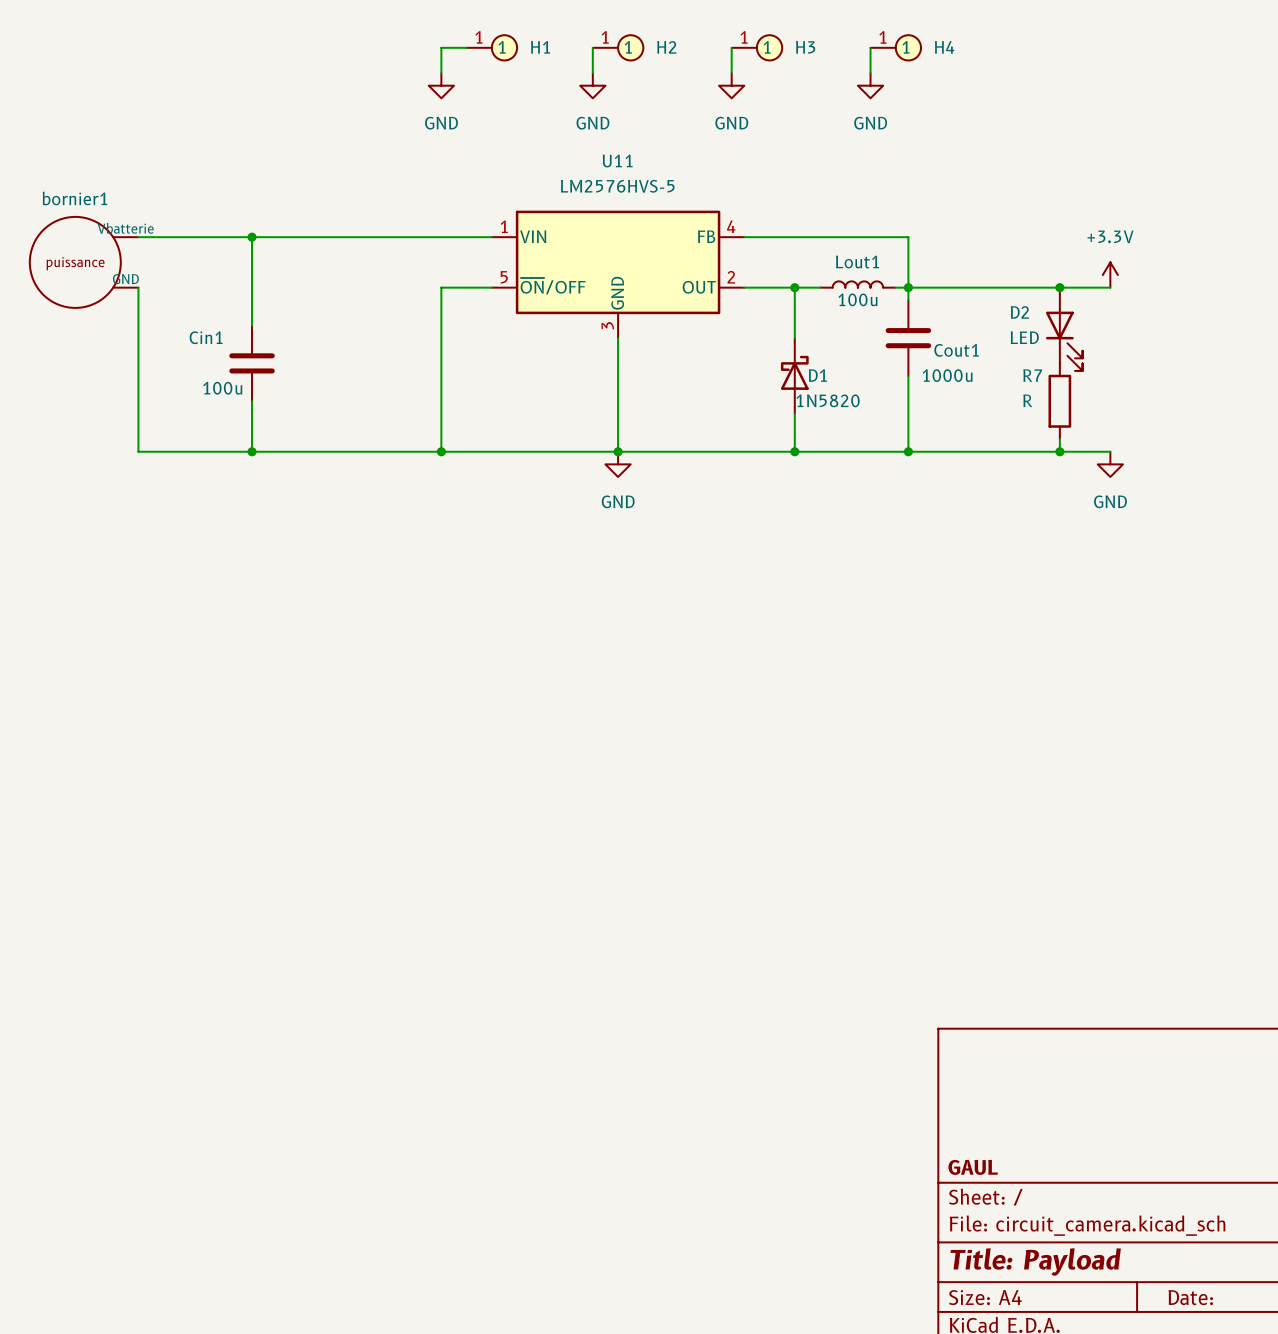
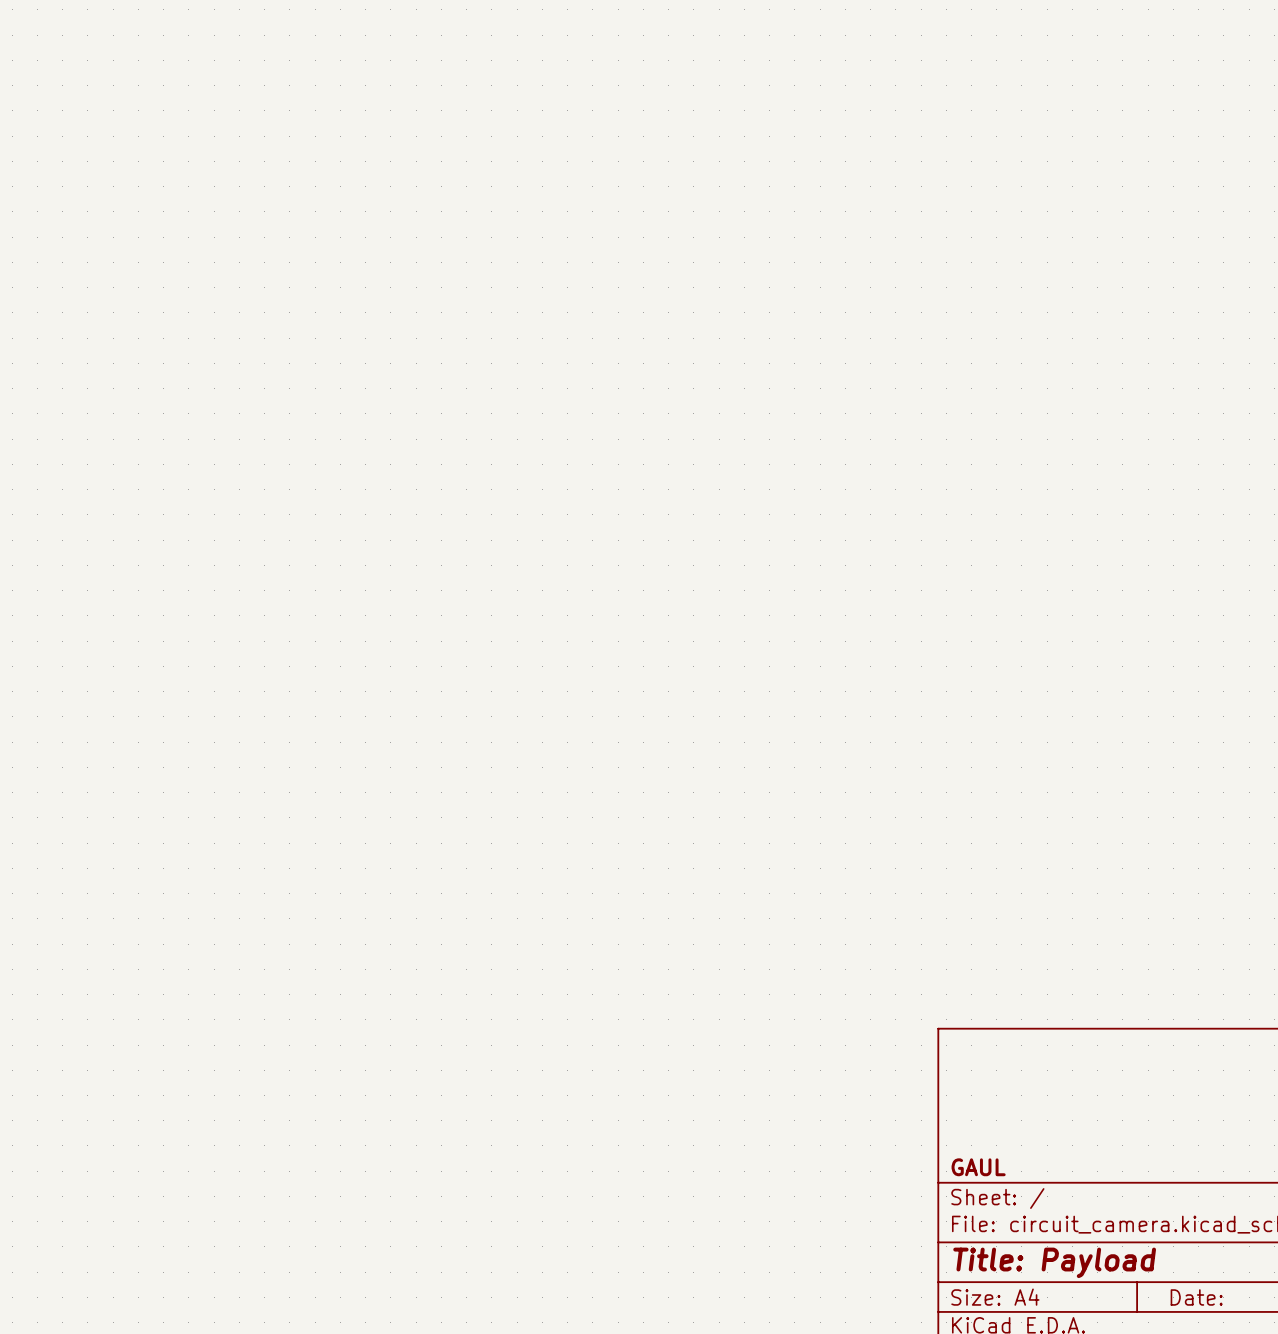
wire: (466, 47) (441, 47) (441, 73) -> none
H1: (491, 47) -> none
wire: (592, 47) (592, 73) -> none
H2: (618, 47) -> none
wire: (731, 47) (731, 73) -> none
H3: (756, 47) -> none
wire: (870, 47) (870, 73) -> none
H4: (895, 47) -> none
power symbol: GND (441, 85) -> none
power symbol: GND (592, 85) -> none
power symbol: GND (731, 85) -> none
power symbol: GND (870, 85) -> none
wire: (138, 237) (491, 237) -> none
wire: (252, 237) (252, 325) -> none
junction: (252, 237) -> none
wire: (744, 237) (908, 237) (908, 300) -> none
bornier1: (84, 262) -> none
U11: LM2576HVS-5 (618, 274) -> none
power symbol: +3.3V (1110, 275) -> none
Lout1: 100u (857, 284) -> none
wire: (138, 287) (138, 451) (1110, 451) -> none
wire: (491, 287) (441, 287) (441, 451) -> none
wire: (744, 287) (820, 287) -> none
wire: (794, 287) (794, 338) -> none
junction: (794, 287) -> none
wire: (895, 287) (1110, 287) -> none
junction: (908, 287) -> none
junction: (1059, 287) -> none
D2: LED (1064, 329) -> none
wire: (618, 338) (618, 451) -> none
Cout1: 1000u (908, 338) -> none
Cin1: 100u (252, 363) -> none
D1: 1N5820 (794, 376) -> none
wire: (908, 376) (908, 451) -> none
wire: (252, 401) (252, 451) -> none
R7: R (1059, 401) -> none
wire: (794, 413) (794, 451) -> none
wire: (1059, 439) (1059, 451) -> none
junction: (252, 451) -> none
junction: (441, 451) -> none
junction: (618, 451) -> none
junction: (794, 451) -> none
junction: (908, 451) -> none
junction: (1059, 451) -> none
power symbol: GND (618, 464) -> none
power symbol: GND (1110, 464) -> none

